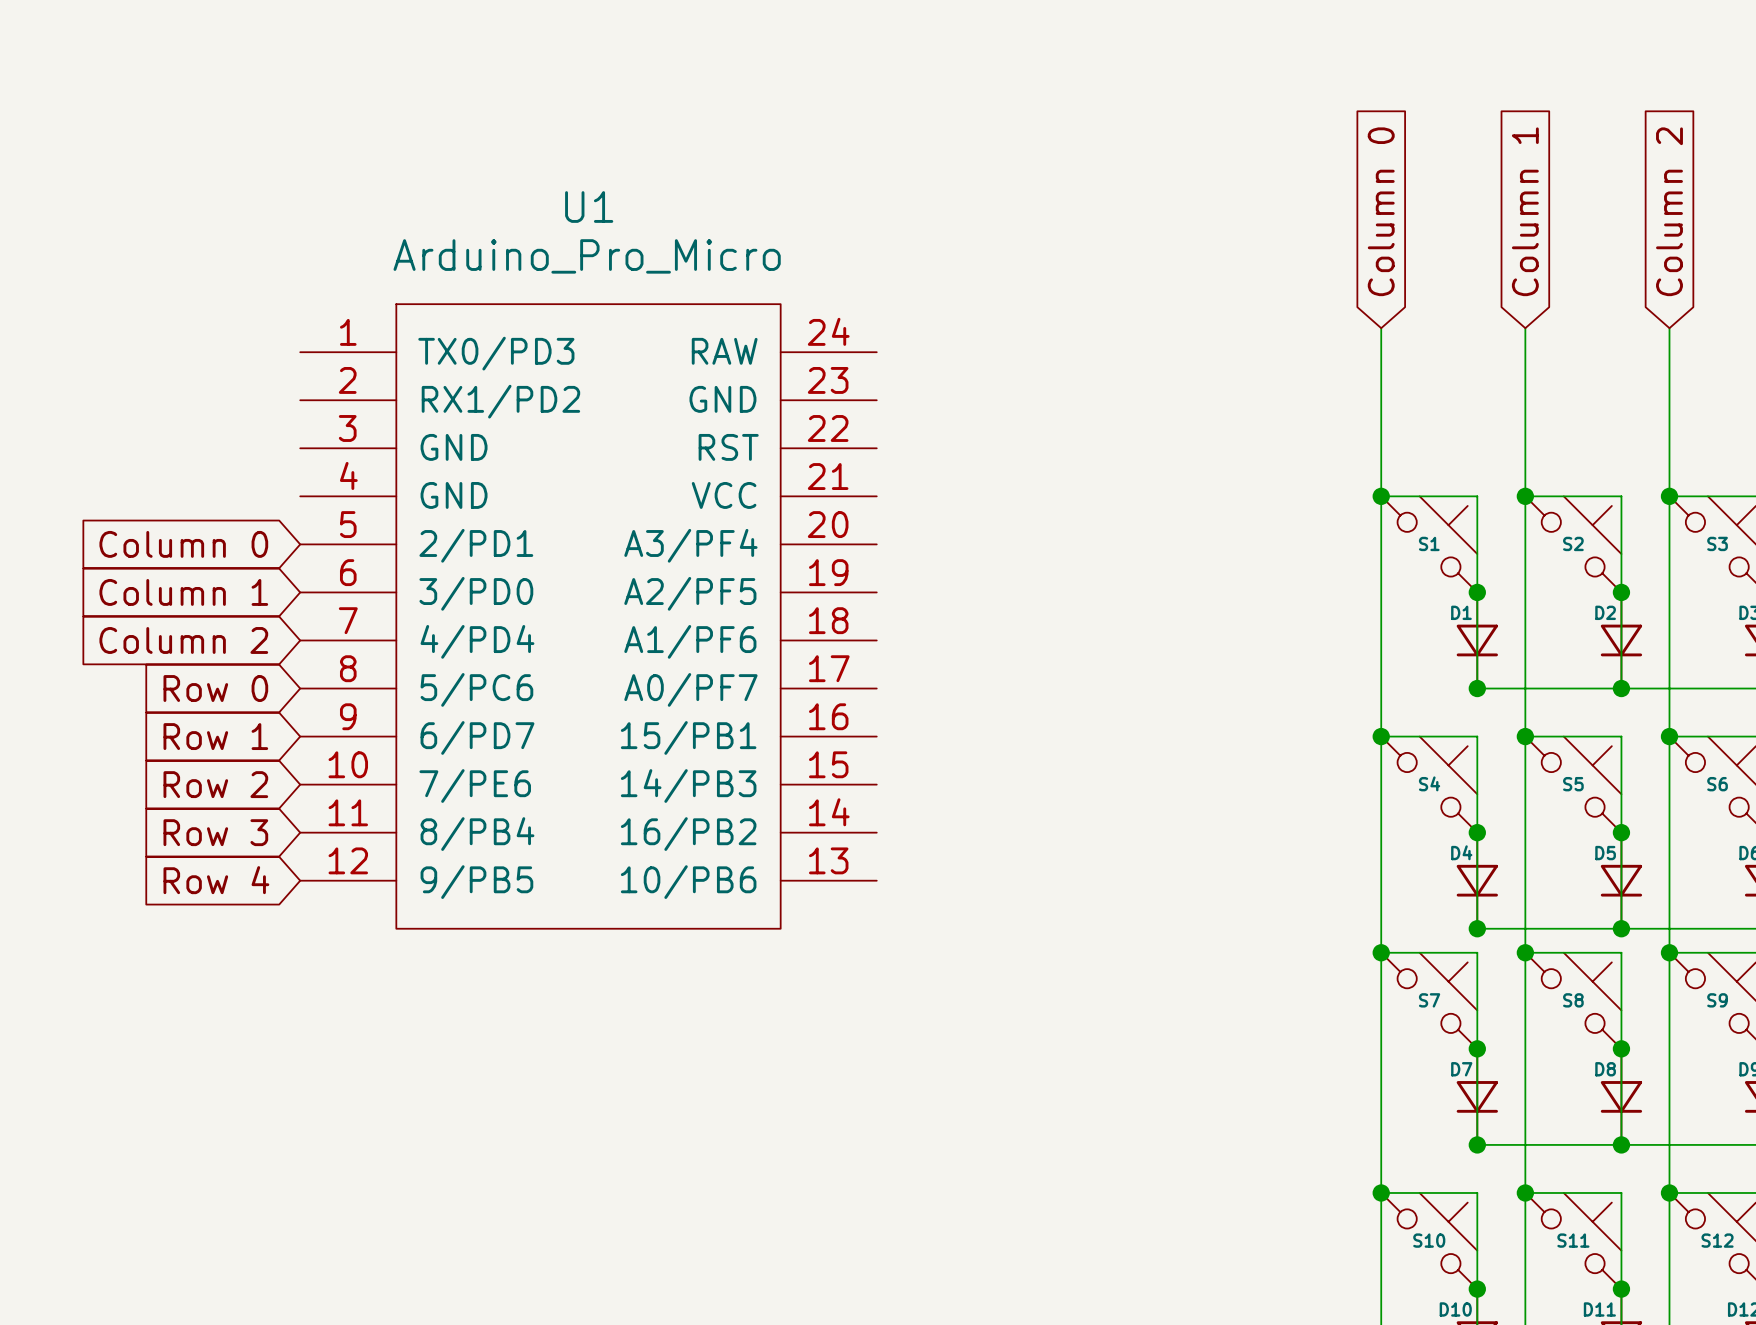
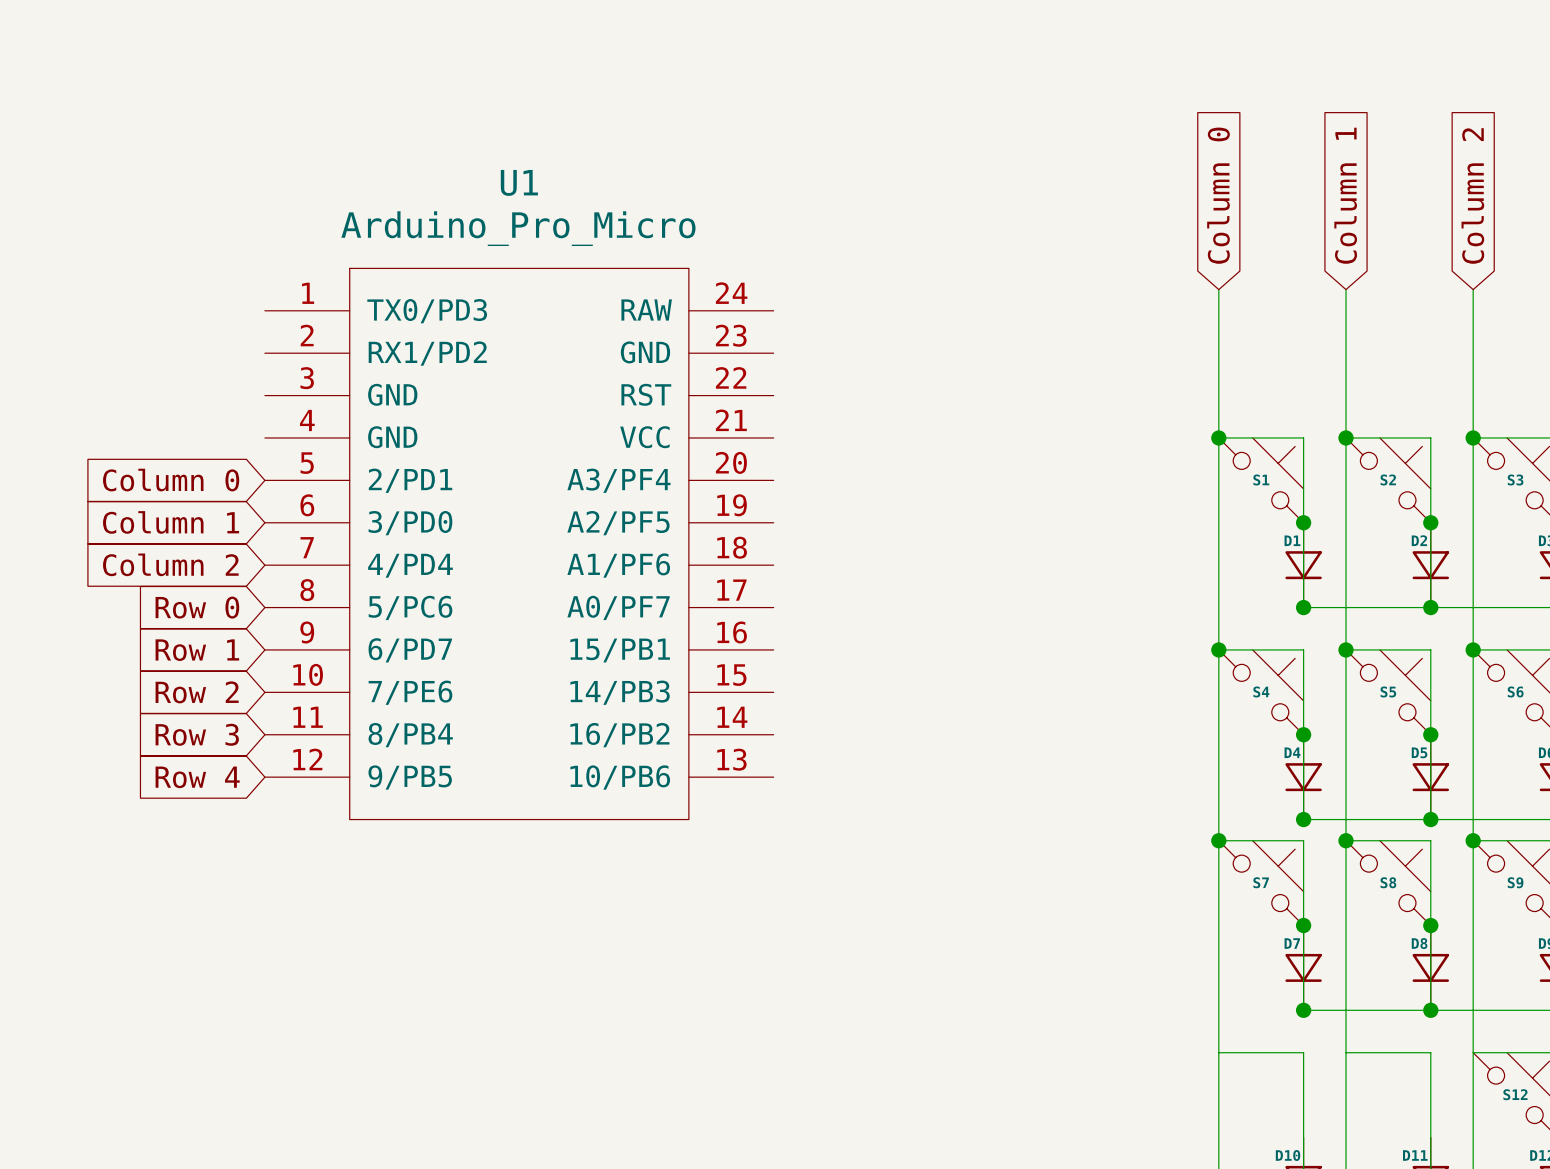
junction: (1381, 1192) -> none
junction: (1525, 1192) -> none
junction: (1669, 1192) -> none
S10: (1429, 1241) -> none
S11: (1573, 1241) -> none
junction: (1477, 1289) -> none
junction: (1621, 1289) -> none

